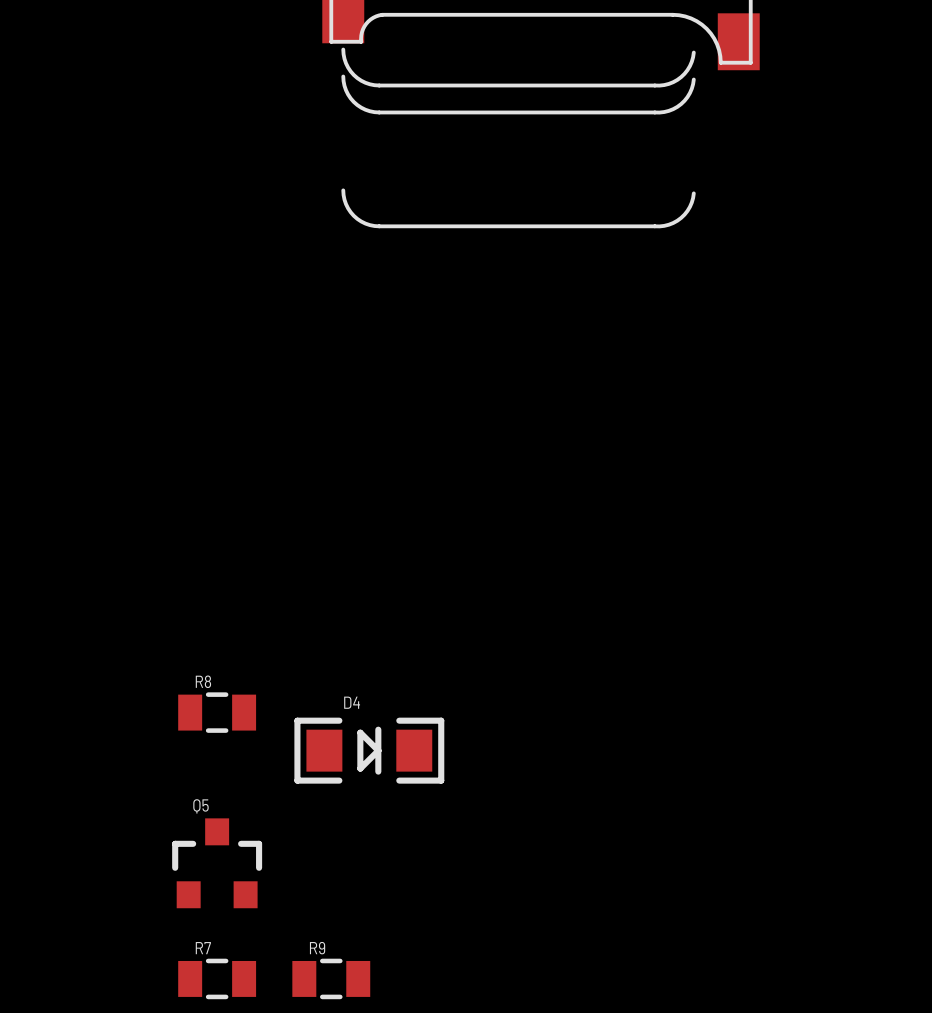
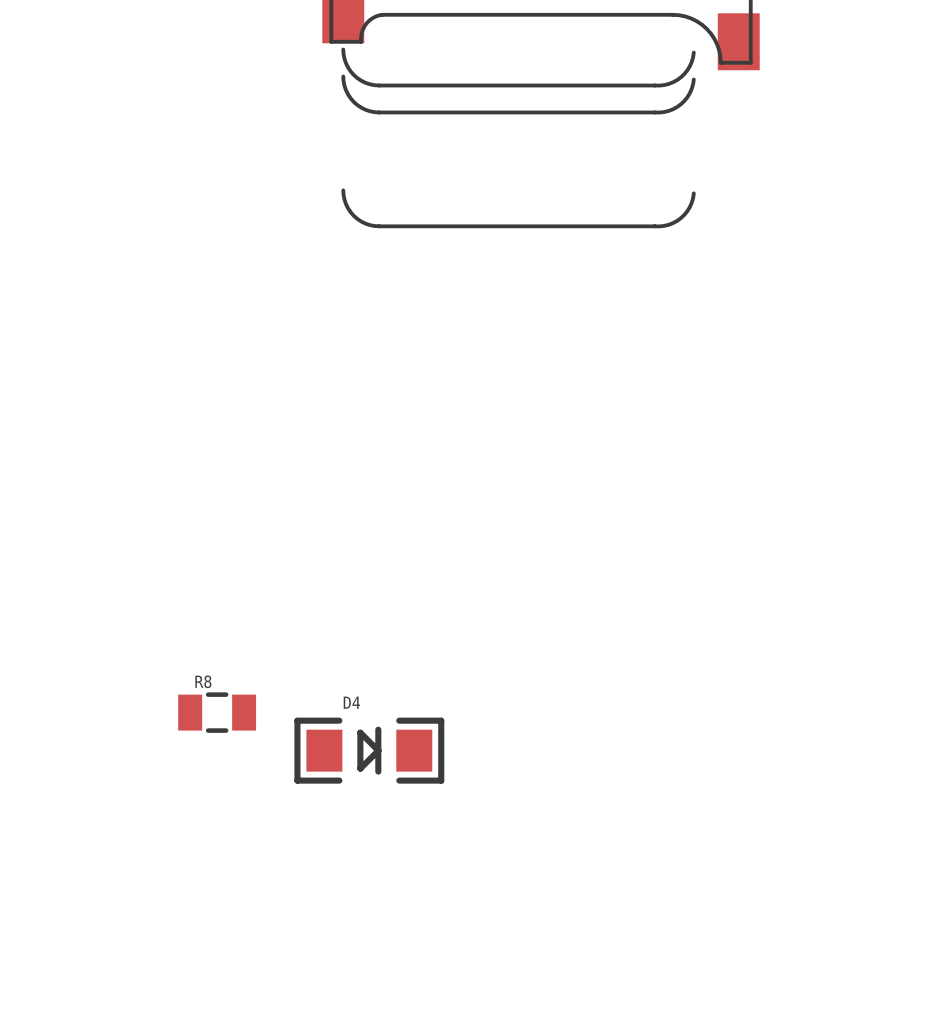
Q5: (217, 863) -> none
R7: (217, 978) -> none
R9: (331, 978) -> none

